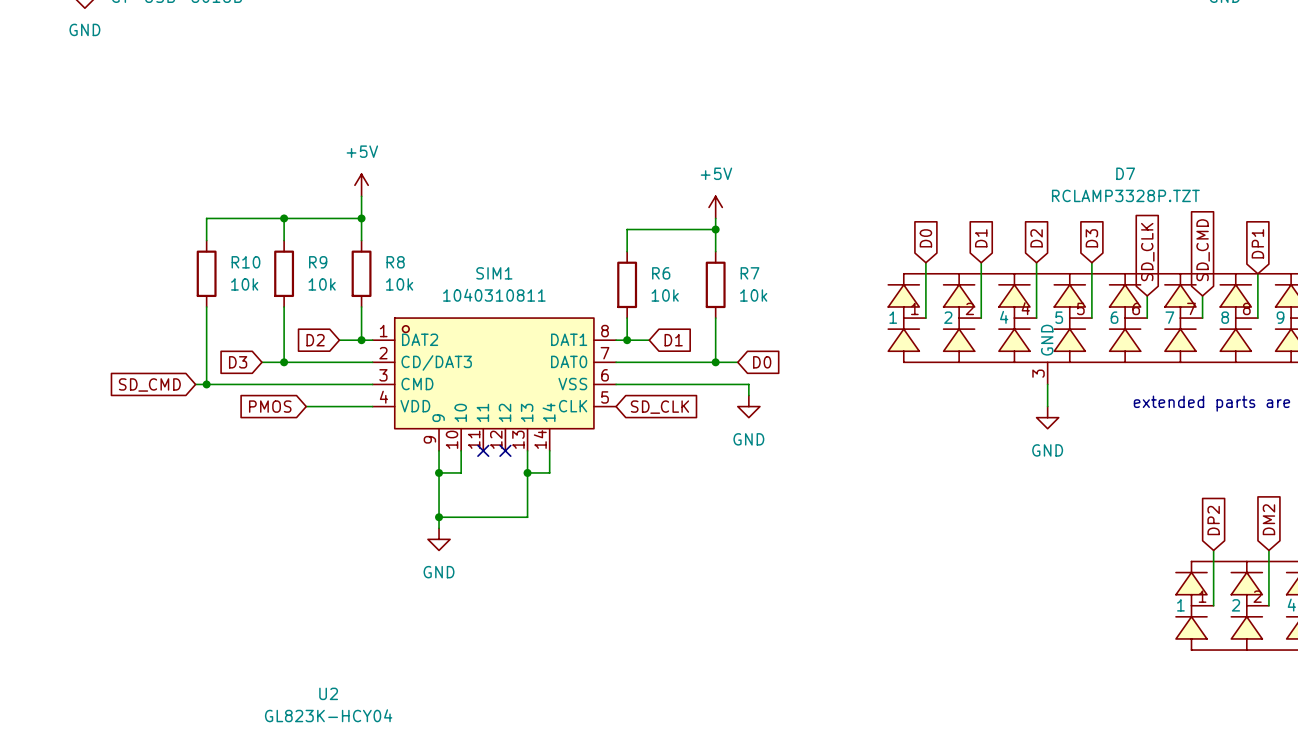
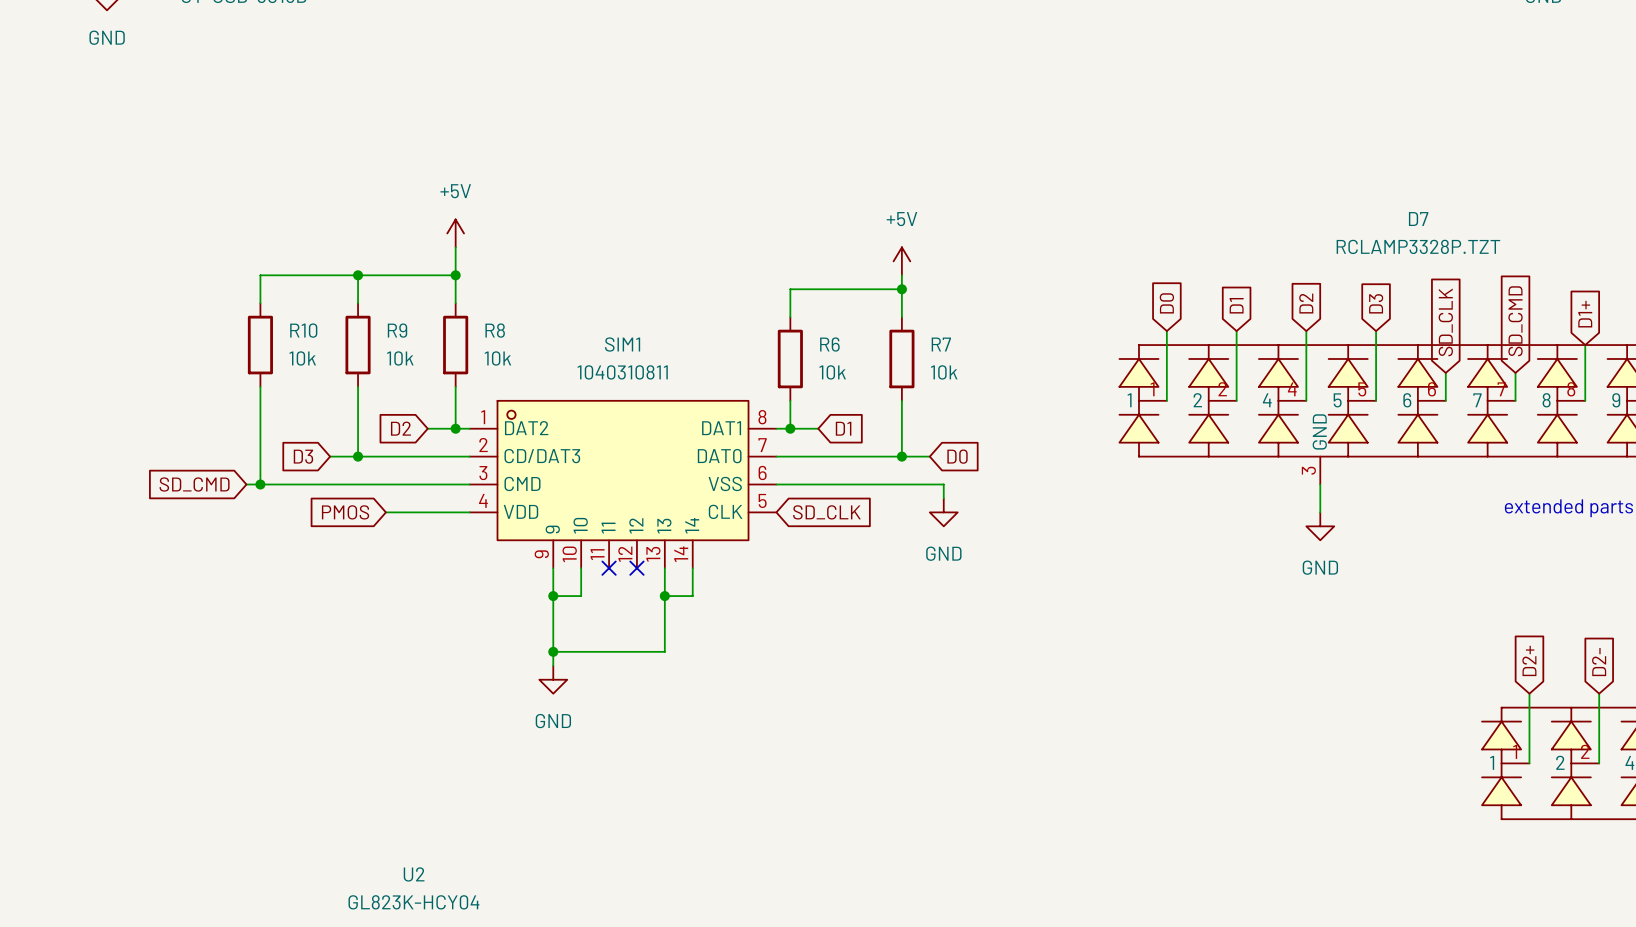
global label: DP1 (1257, 243) -> D1+ (1585, 314)
global label: DM2 (1268, 519) -> D2- (1599, 662)
global label: DP2 (1213, 520) -> D2+ (1529, 660)

